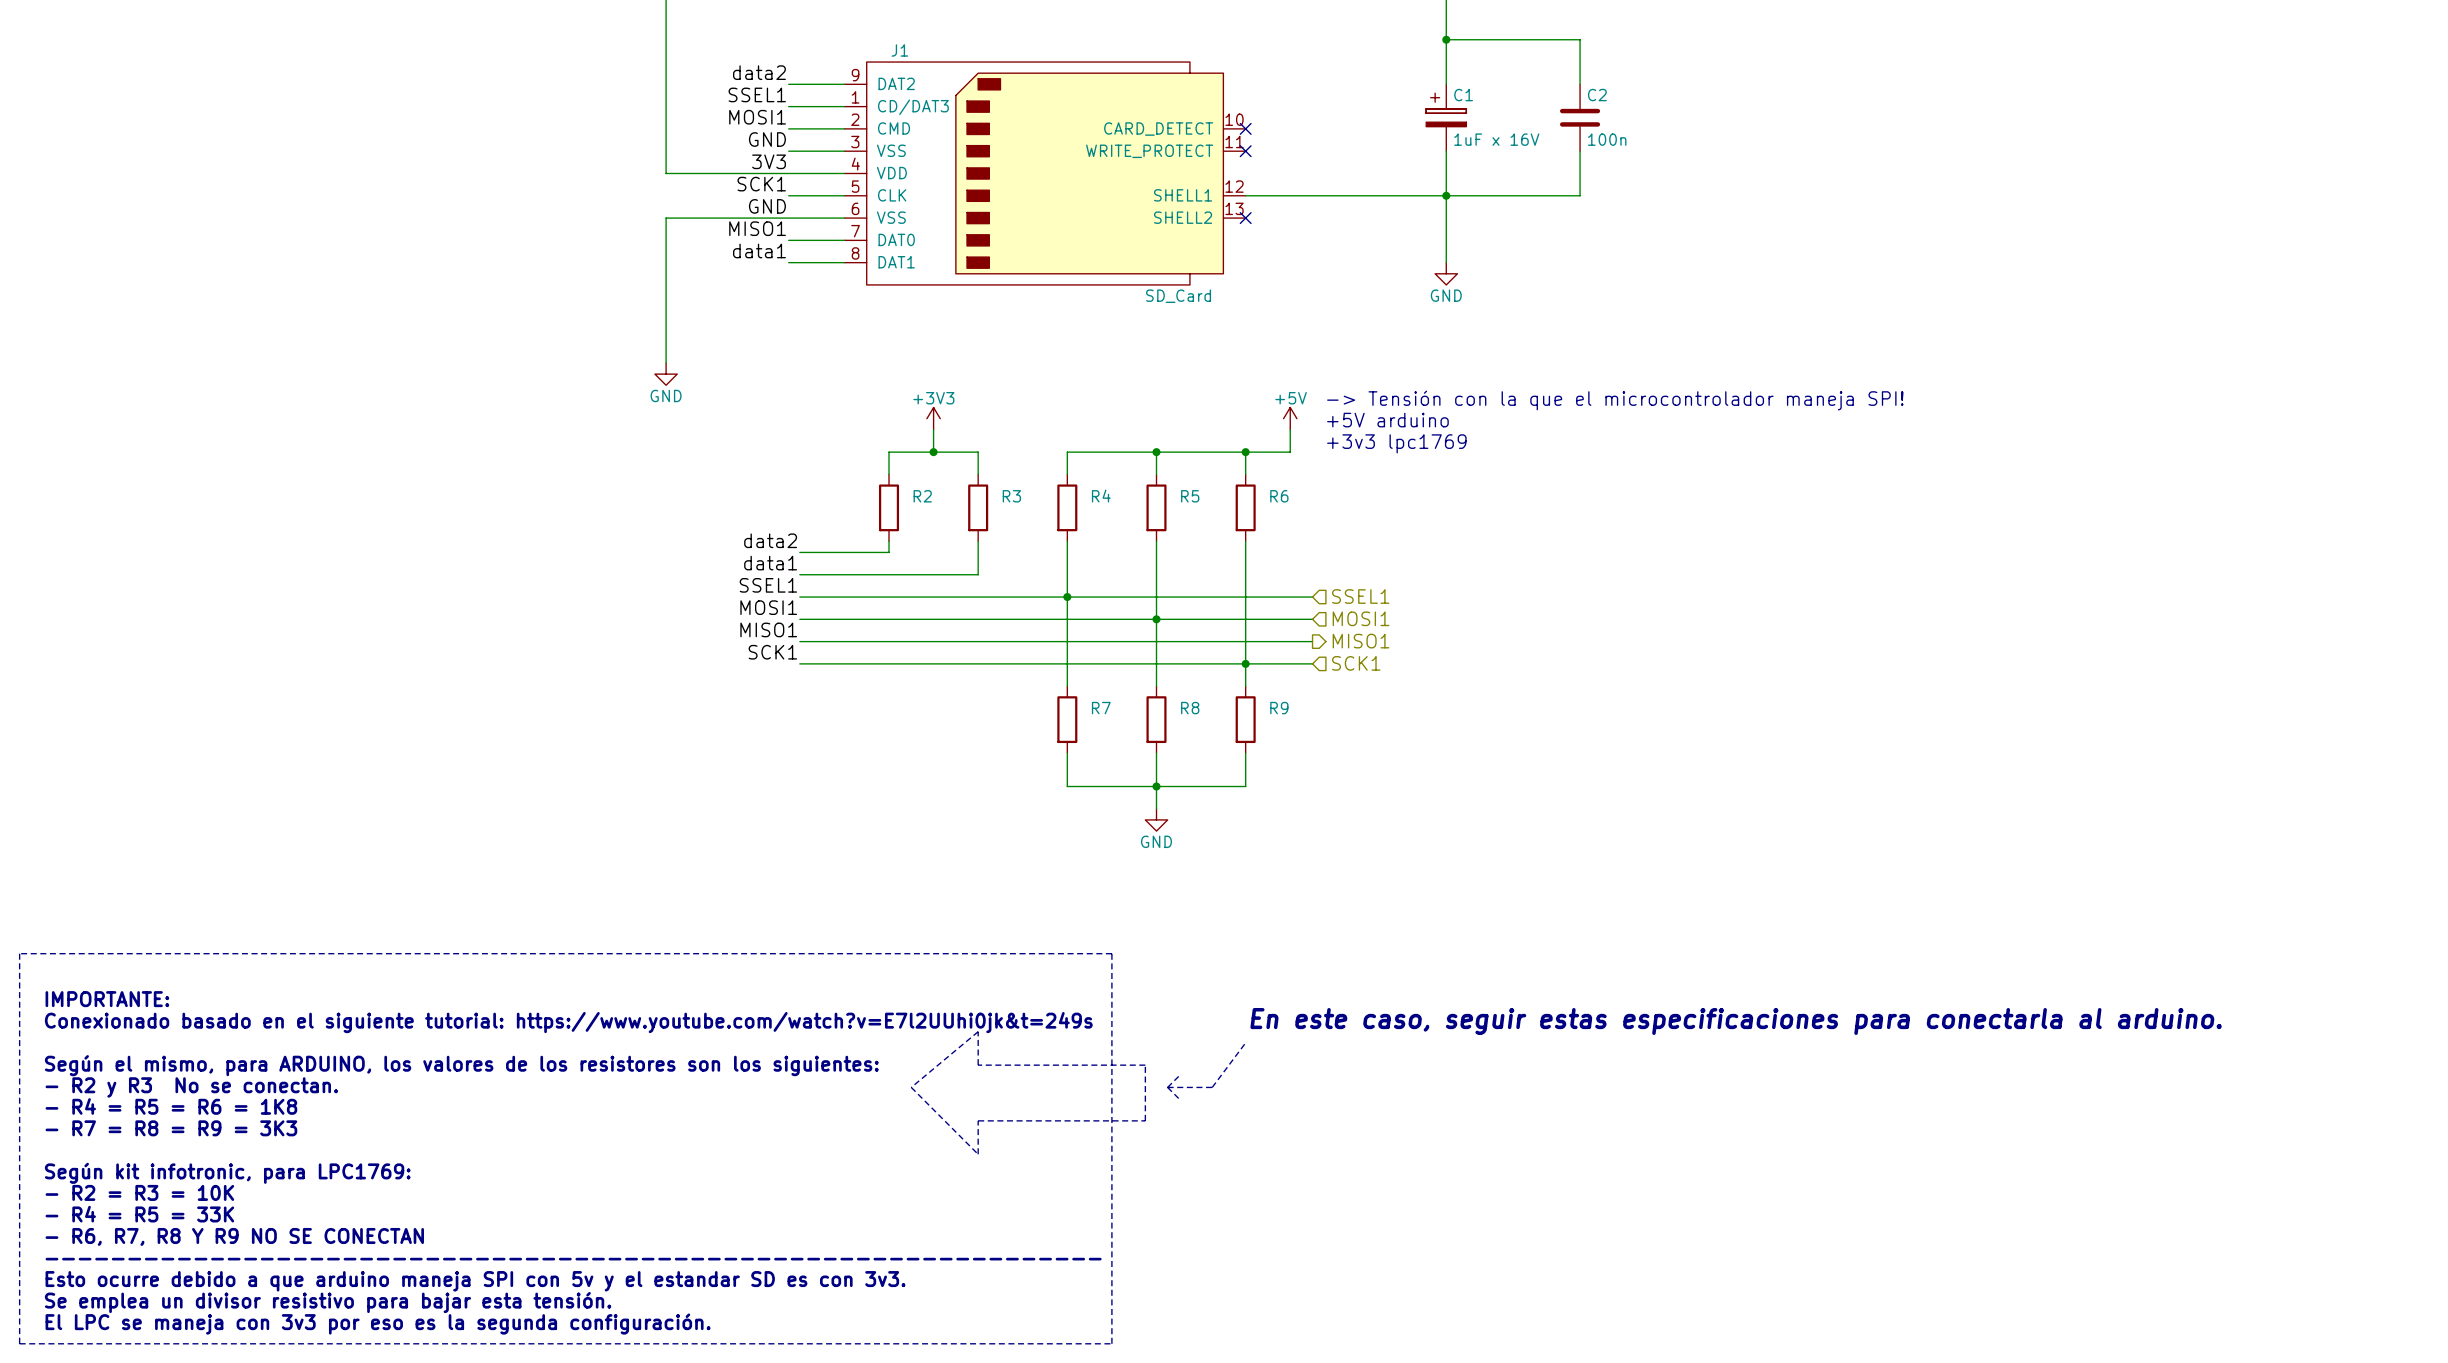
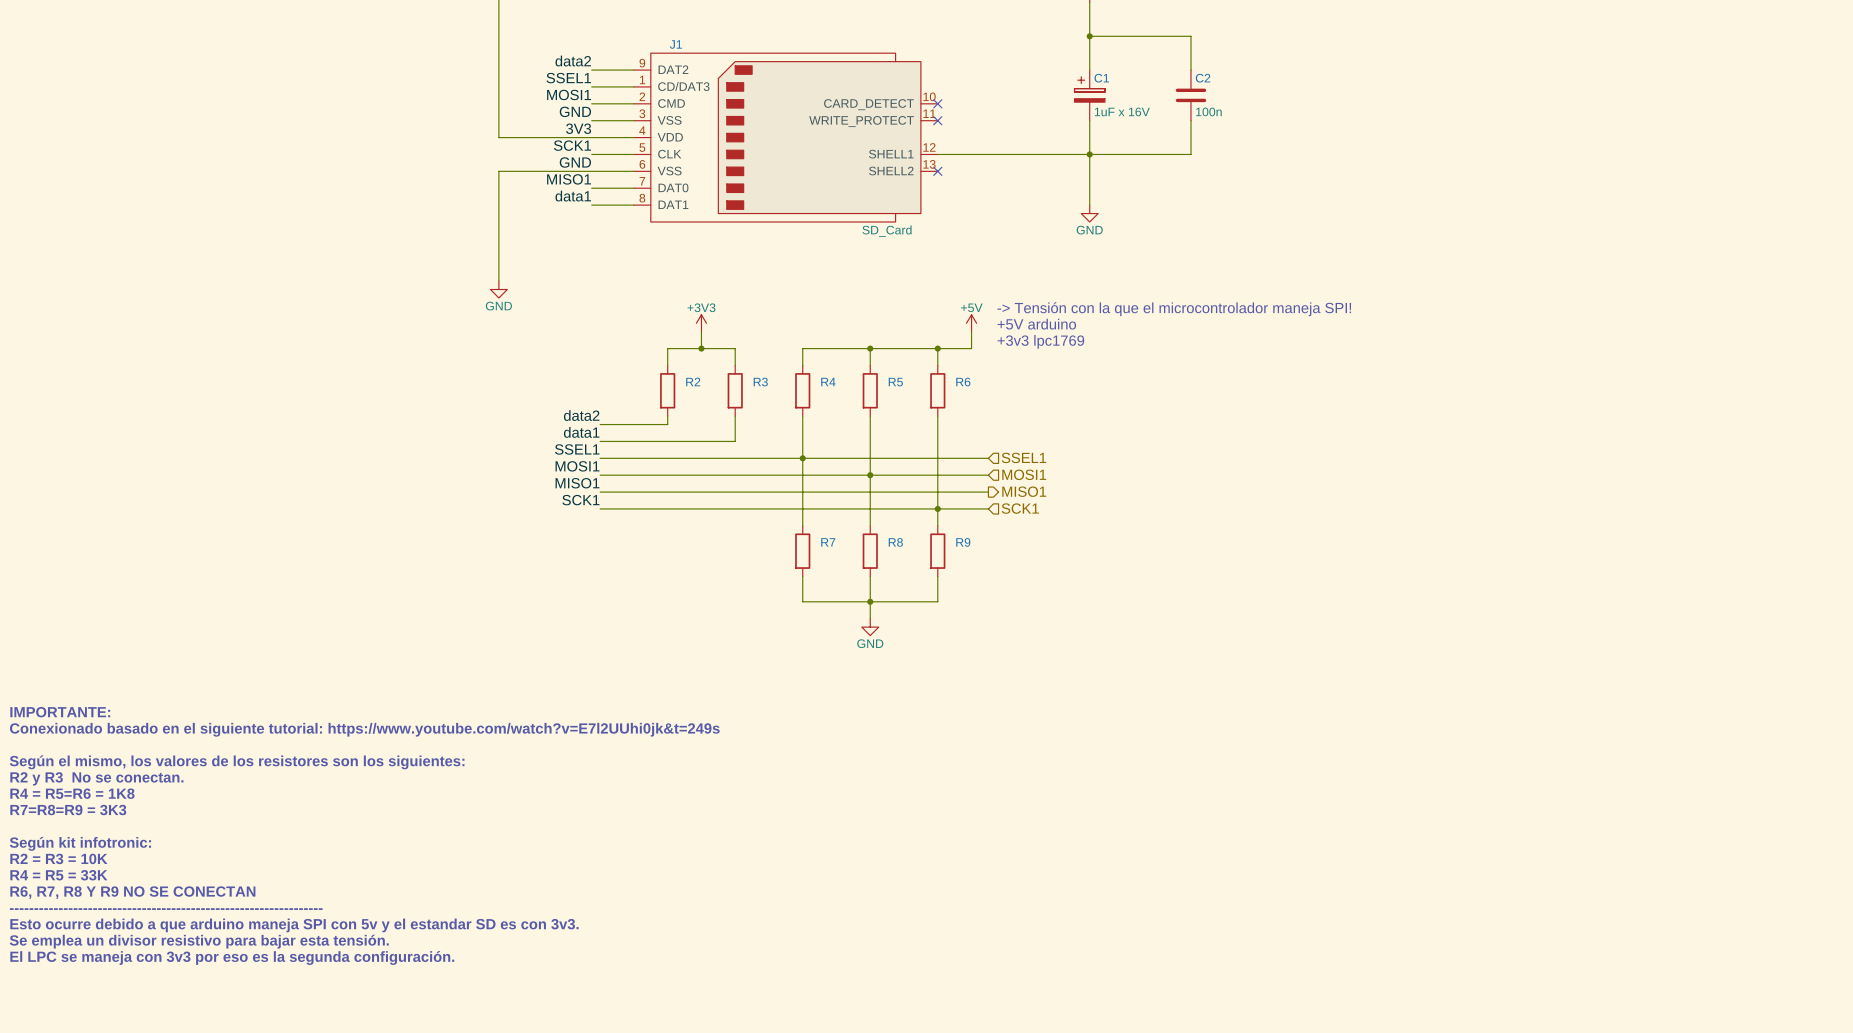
line: (19, 953) (1111, 953) (1111, 1343) (19, 1343) (19, 953) -> none
text: none -> Según el mismo, los valores de los resistores son los siguientes: (237, 762)
text position: IMPORTANTE: (107, 999) -> IMPORTANTE: (60, 712)
text: none -> R2 y R3 No se conectan. (96, 778)
text: En este caso, seguir estas especificaciones para conectarla al arduino. (1736, 1021) -> none
text position: Conexionado basado en el siguiente tutorial: https://www.youtube.com/watch?v=E7l2UUhi0jk&t=249s (568, 1022) -> Conexionado basado en el siguiente tutorial: https://www.youtube.com/watch?v=E7l2UUhi0jk&t=249s (364, 729)
line: (978, 1031) (978, 1065) (1145, 1065) (1145, 1120) (978, 1120) (978, 1154) (911, 1087) (978, 1031) -> none
text: none -> R4 = R5=R6 = 1K8 (72, 793)
line: (1245, 1042) (1212, 1087) (1167, 1087) -> none
text: none -> R7=R8=R9 = 3K3 (68, 810)
text: Según el mismo, para ARDUINO, los valores de los resistores son los siguientes: (461, 1065) -> none
line: (1178, 1076) (1167, 1087) -> none
text: - R2 y R3 No se conectan. (191, 1087) -> none
line: (1167, 1087) (1178, 1098) -> none
text: none -> Según kit infotronic: (80, 843)
text: - R4 = R5 = R6 = 1K8 (171, 1106) -> R2 = R3 = 10K (58, 858)
text: - R7 = R8 = R9 = 3K3 (171, 1128) -> R4 = R5 = 33K (58, 875)
text: none -> R6, R7, R8 Y R9 NO SE CONECTAN (132, 892)
text: Según kit infotronic, para LPC1769: (227, 1173) -> none
text: - R2 = R3 = 10K (139, 1192) -> none
text: - R4 = R5 = 33K (139, 1214) -> none
text: - R6, R7, R8 Y R9 NO SE CONECTAN (234, 1236) -> none
text position: ---------------------------------------------------------------- (573, 1259) -> ---------------------------------------------------------------- (166, 909)
text position: Esto ocurre debido a que arduino maneja SPI con 5v y el estandar SD es con 3v3. (475, 1281) -> Esto ocurre debido a que arduino maneja SPI con 5v y el estandar SD es con 3v3. (294, 925)
text position: Se emplea un divisor resistivo para bajar esta tensión. (328, 1302) -> Se emplea un divisor resistivo para bajar esta tensión. (199, 941)
text position: El LPC se maneja con 3v3 por eso es la segunda configuración. (378, 1324) -> El LPC se maneja con 3v3 por eso es la segunda configuración. (232, 957)

